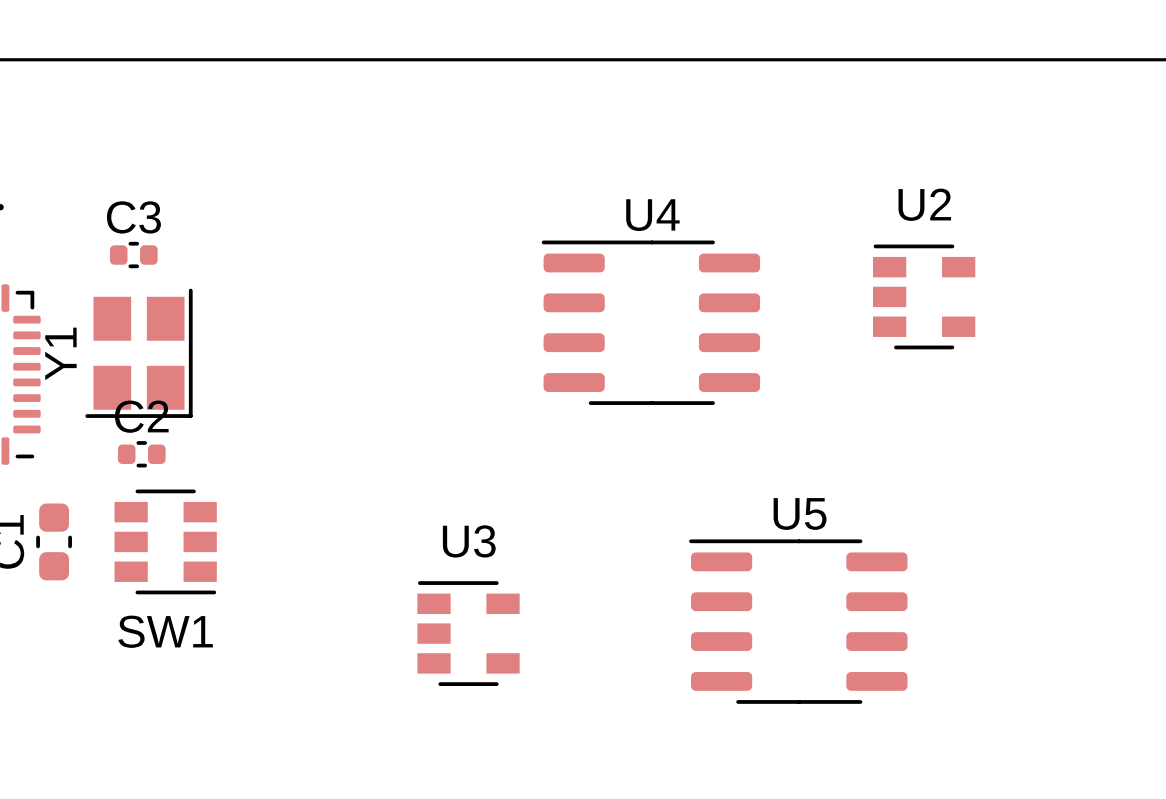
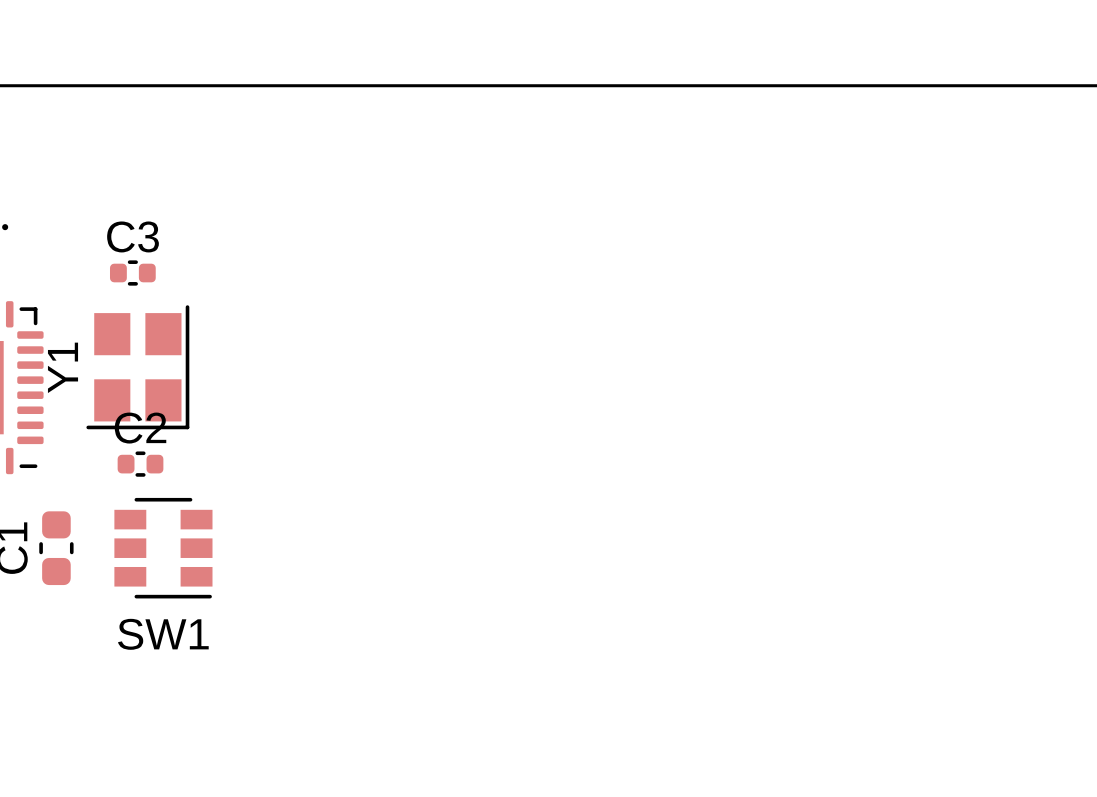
U2: (924, 296) -> none
U4: (650, 322) -> none
U5: (798, 621) -> none
U3: (468, 633) -> none

